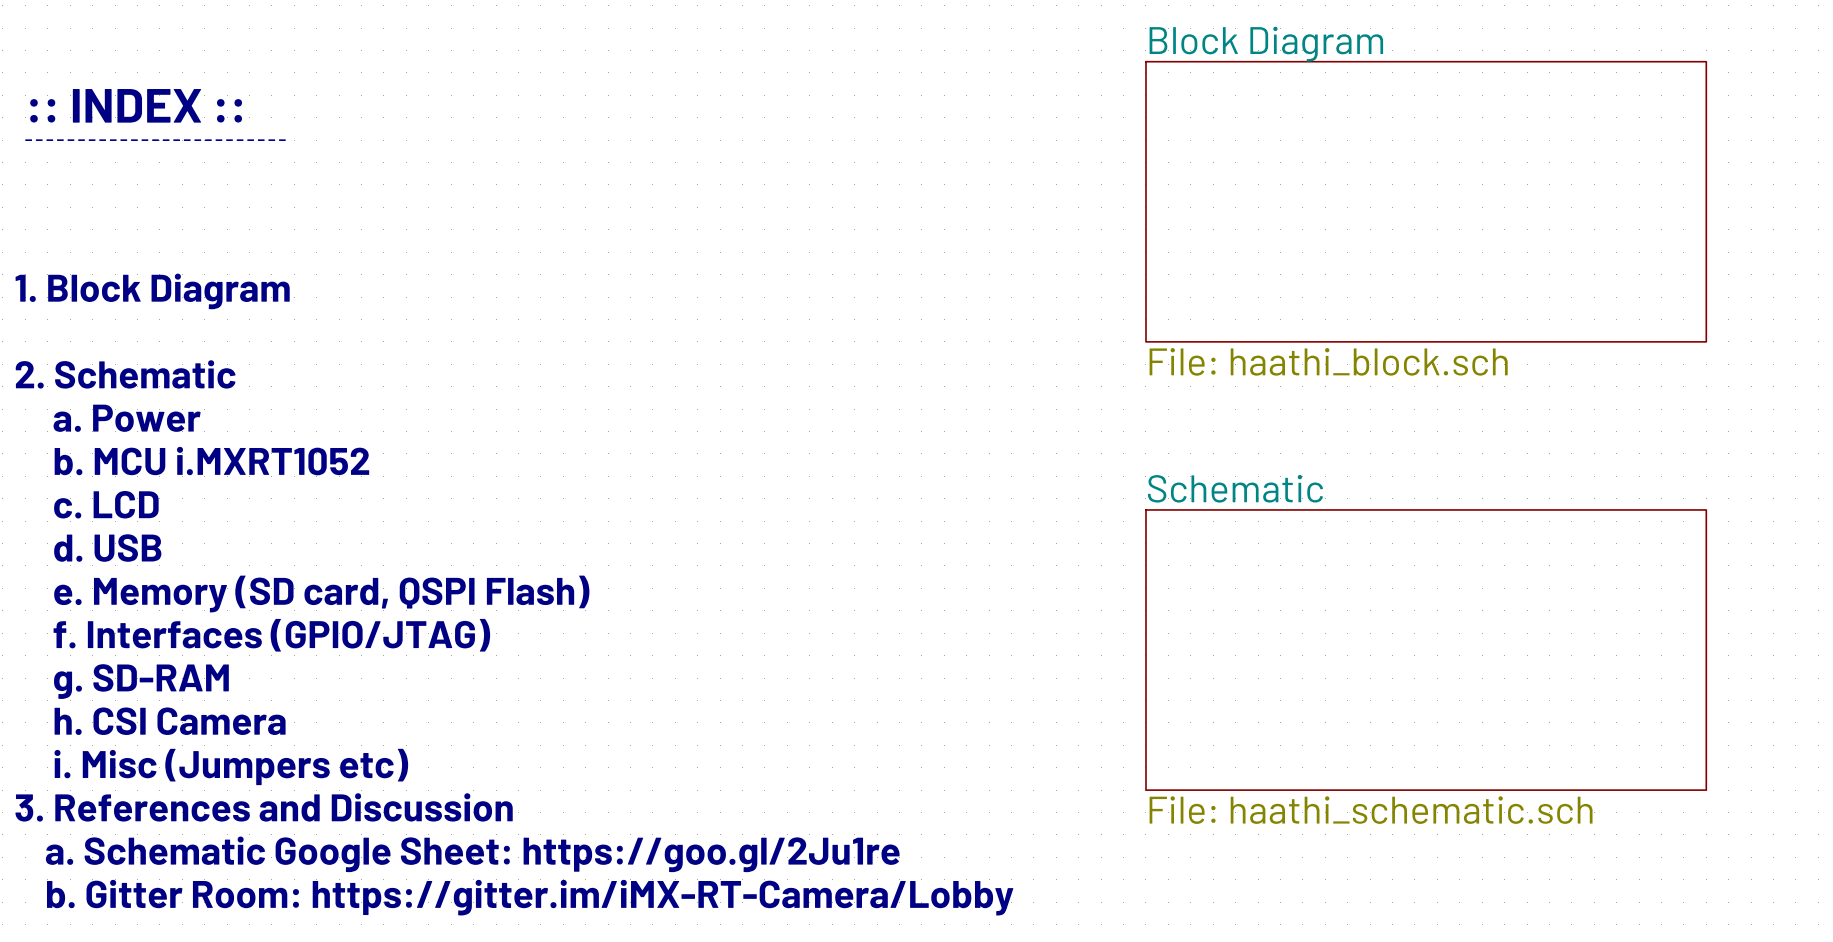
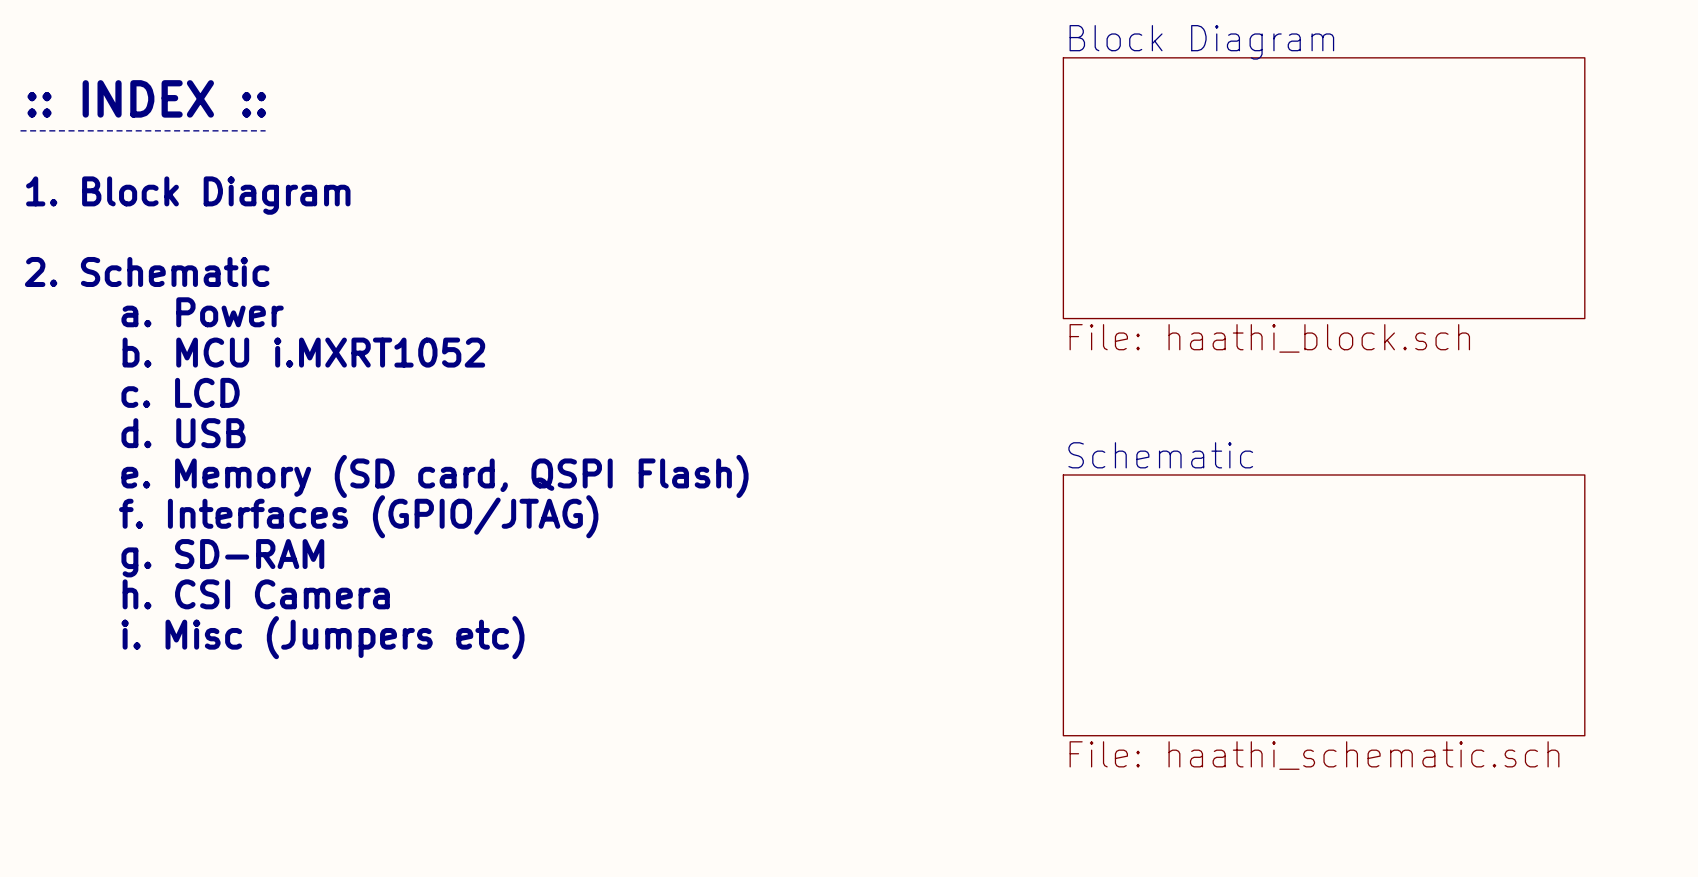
text position: 1. Block Diagram (152, 291) -> 1. Block Diagram (188, 195)
text position: 2. Schematic (125, 374) -> 2. Schematic (147, 271)
text position: a. Power (127, 418) -> a. Power (202, 312)
text position: b. MCU i.MXRT1052 (211, 461) -> b. MCU i.MXRT1052 (303, 352)
text position: c. LCD (106, 504) -> c. LCD (180, 392)
text position: d. USB (107, 548) -> d. USB (183, 433)
text position: e. Memory (SD card, QSPI Flash) (321, 594) -> e. Memory (SD card, QSPI Flash) (434, 476)
text position: f. Interfaces (GPIO/JTAG) (271, 635) -> f. Interfaces (GPIO/JTAG) (358, 516)
text position: g. SD-RAM (141, 681) -> g. SD-RAM (222, 558)
text position: h. CSI Camera (170, 721) -> h. CSI Camera (256, 594)
text position: i. Misc (Jumpers etc) (231, 766) -> i. Misc (Jumpers etc) (322, 637)
text: 3. References and Discussion (264, 807) -> none
text: a. Schematic Google Sheet: https://goo.gl/2Ju1re (472, 854) -> none
text: b. Gitter Room: https://gitter.im/iMX-RT-Camera/Lobby (530, 897) -> none

